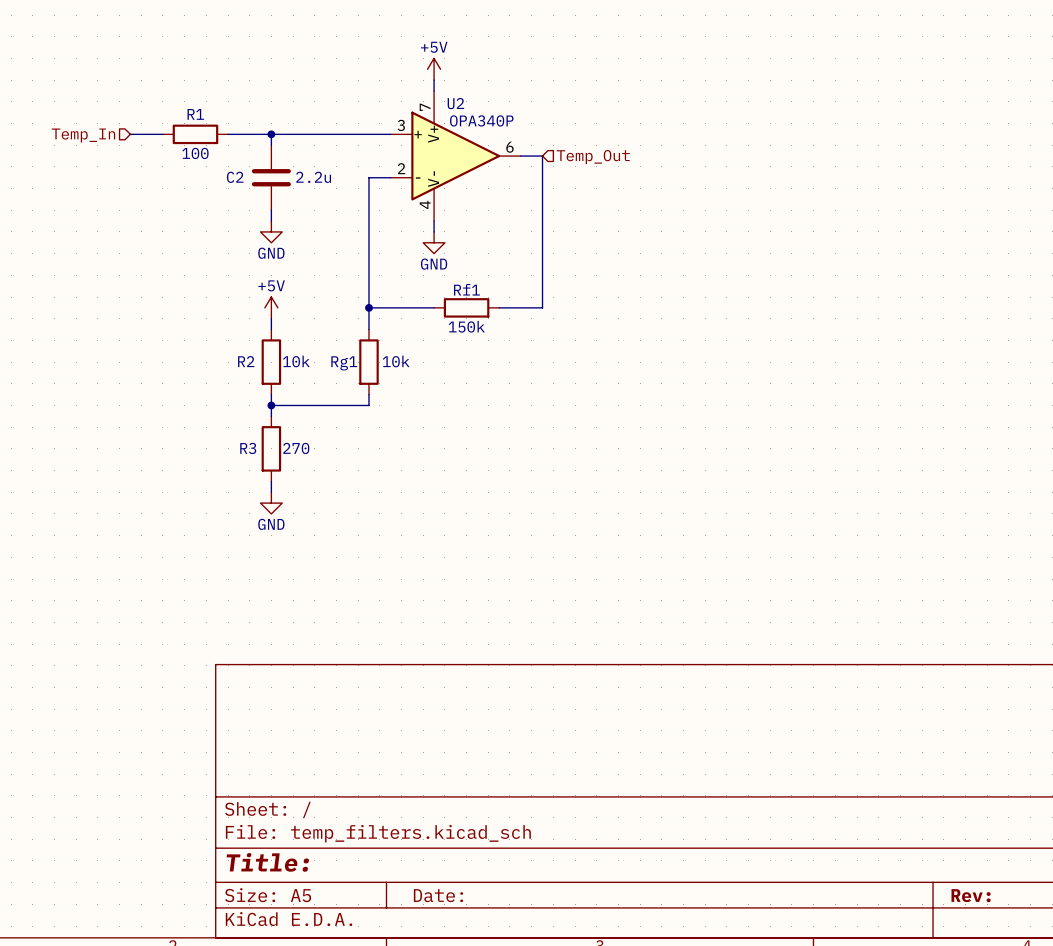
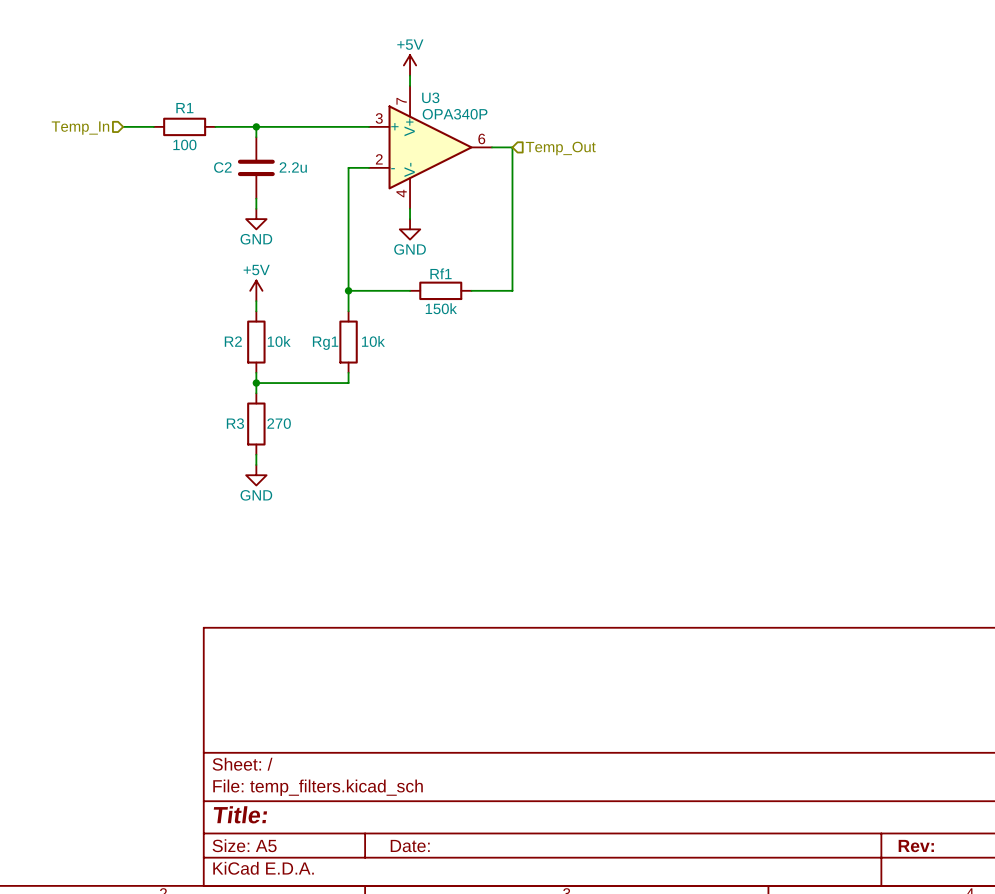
U2 name: U2 (455, 103) -> U3 (430, 97)

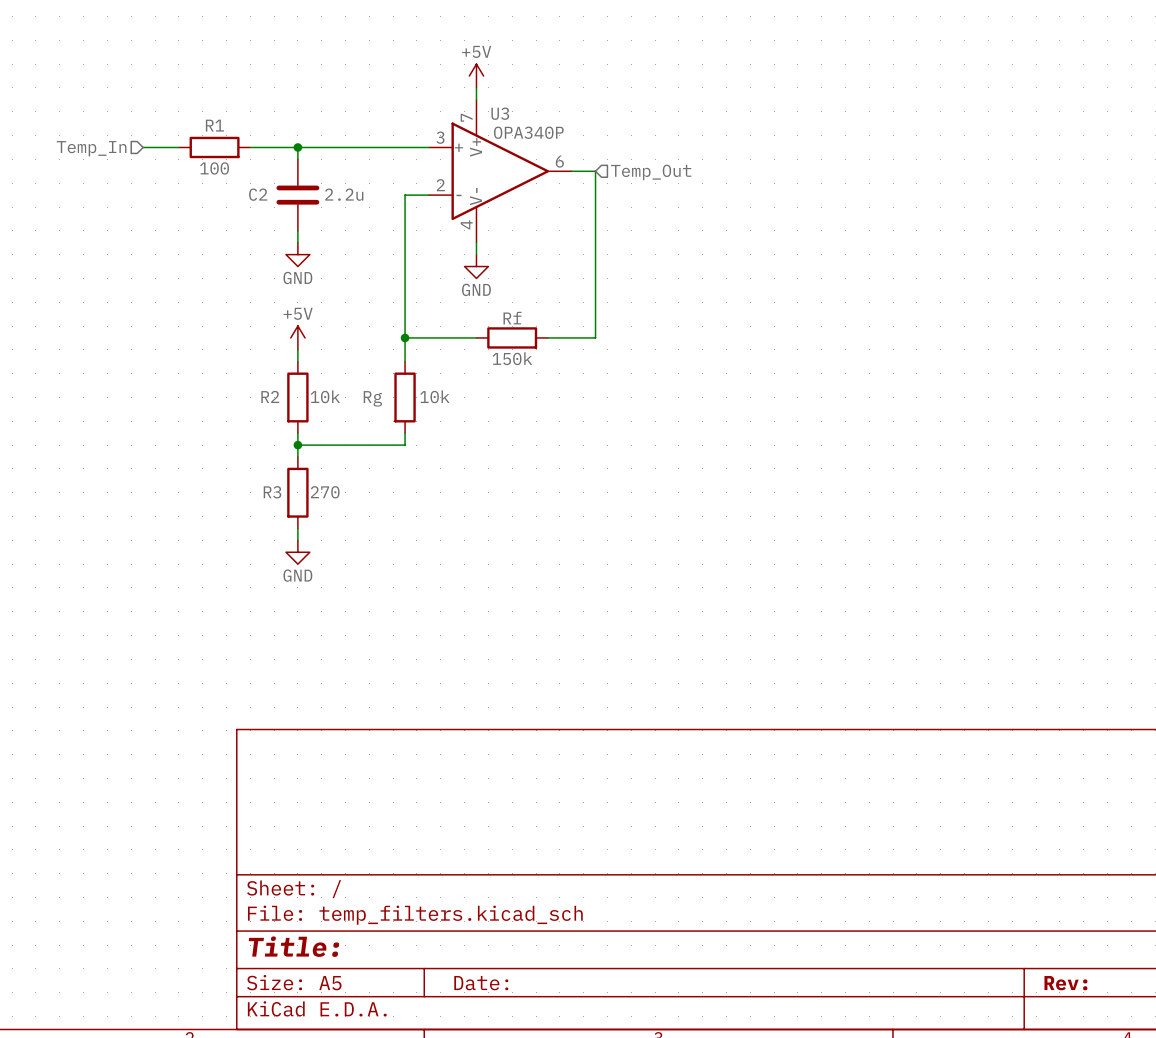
Rf1 name: Rf1 (441, 273) -> Rf (512, 318)
Rg1 name: Rg1 (325, 343) -> Rg (372, 398)

